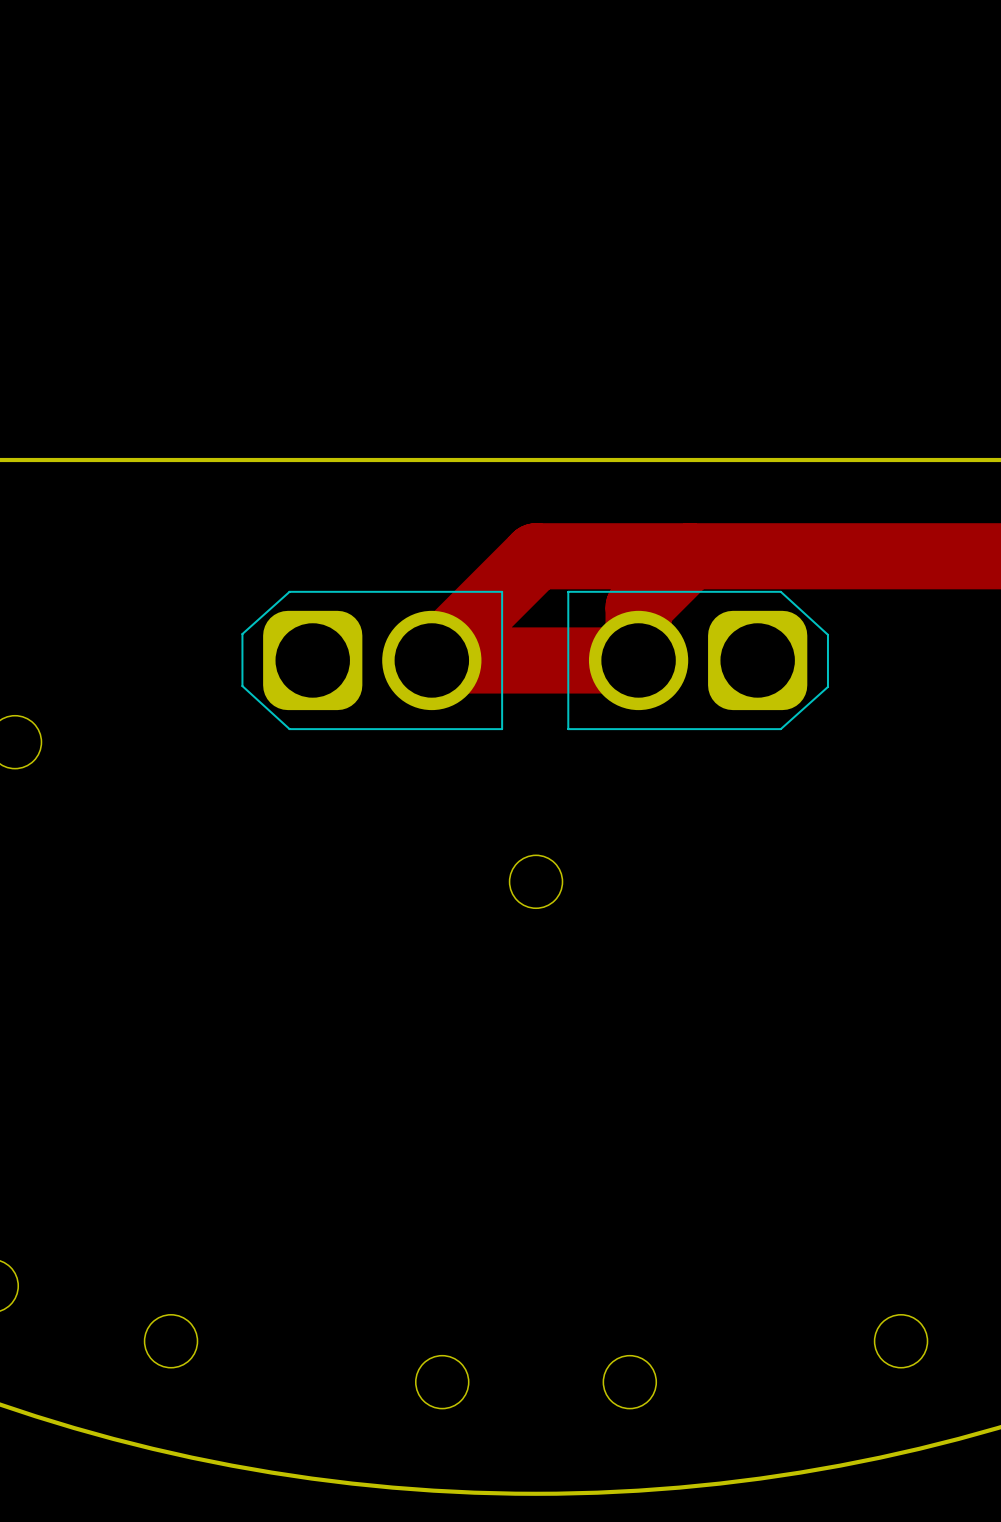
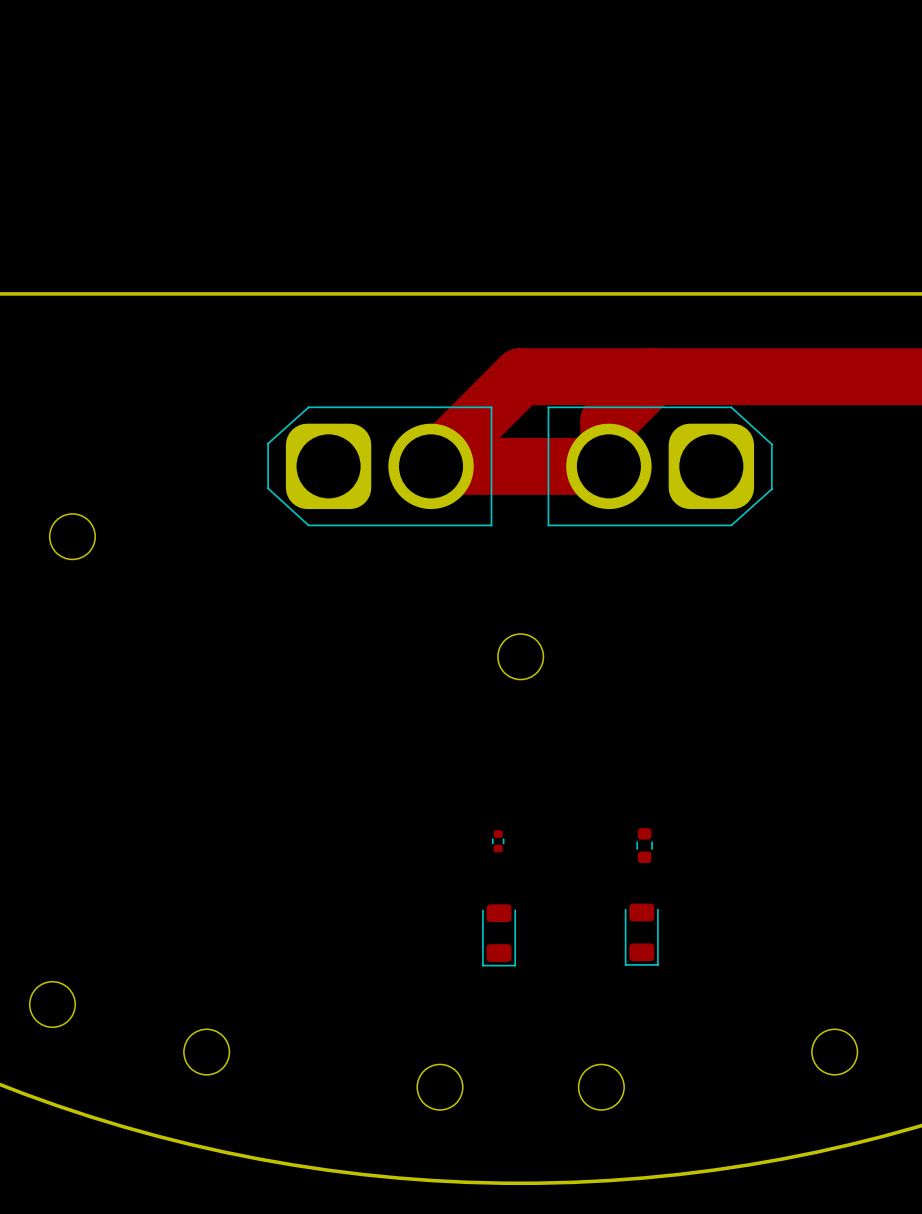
part: none -> (498, 841)
part: none -> (644, 845)
part: none -> (641, 934)
part: none -> (499, 935)

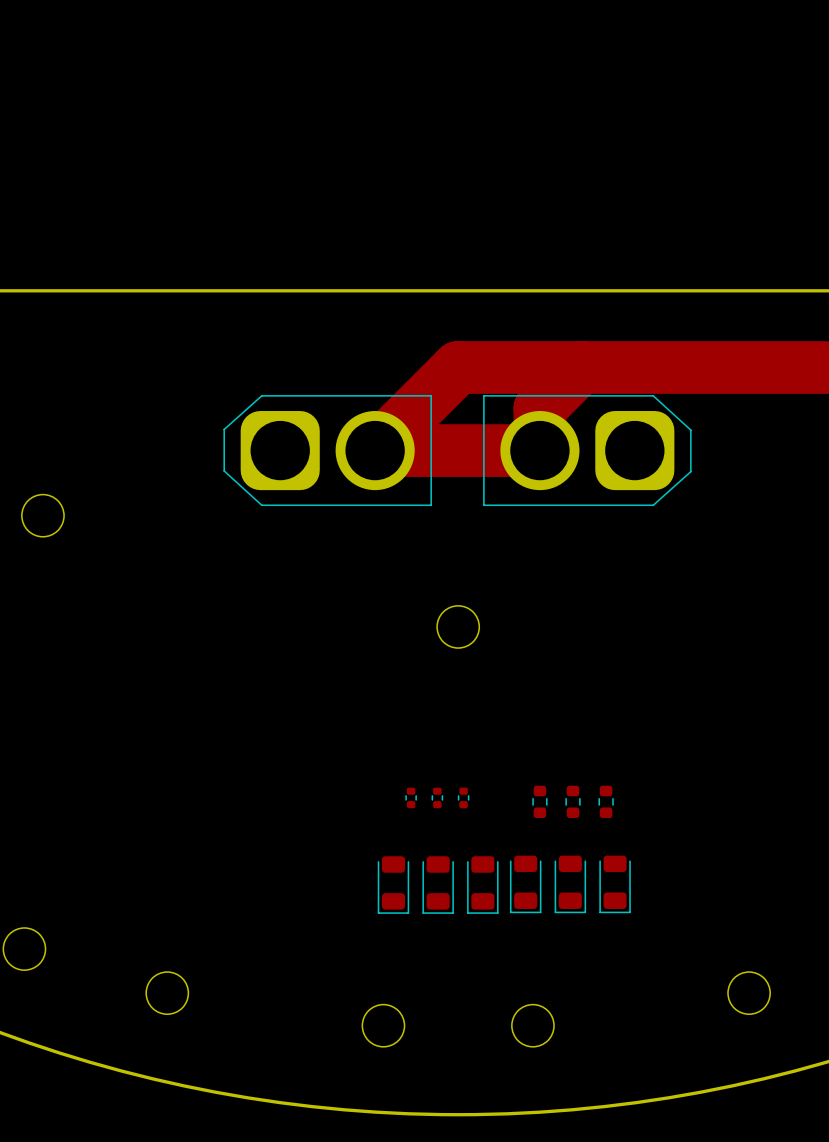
part: none -> (411, 797)
part: none -> (463, 797)
part: none -> (539, 801)
part: none -> (606, 801)
part: none -> (525, 884)
part: none -> (615, 884)
part: none -> (393, 885)
part: none -> (482, 885)

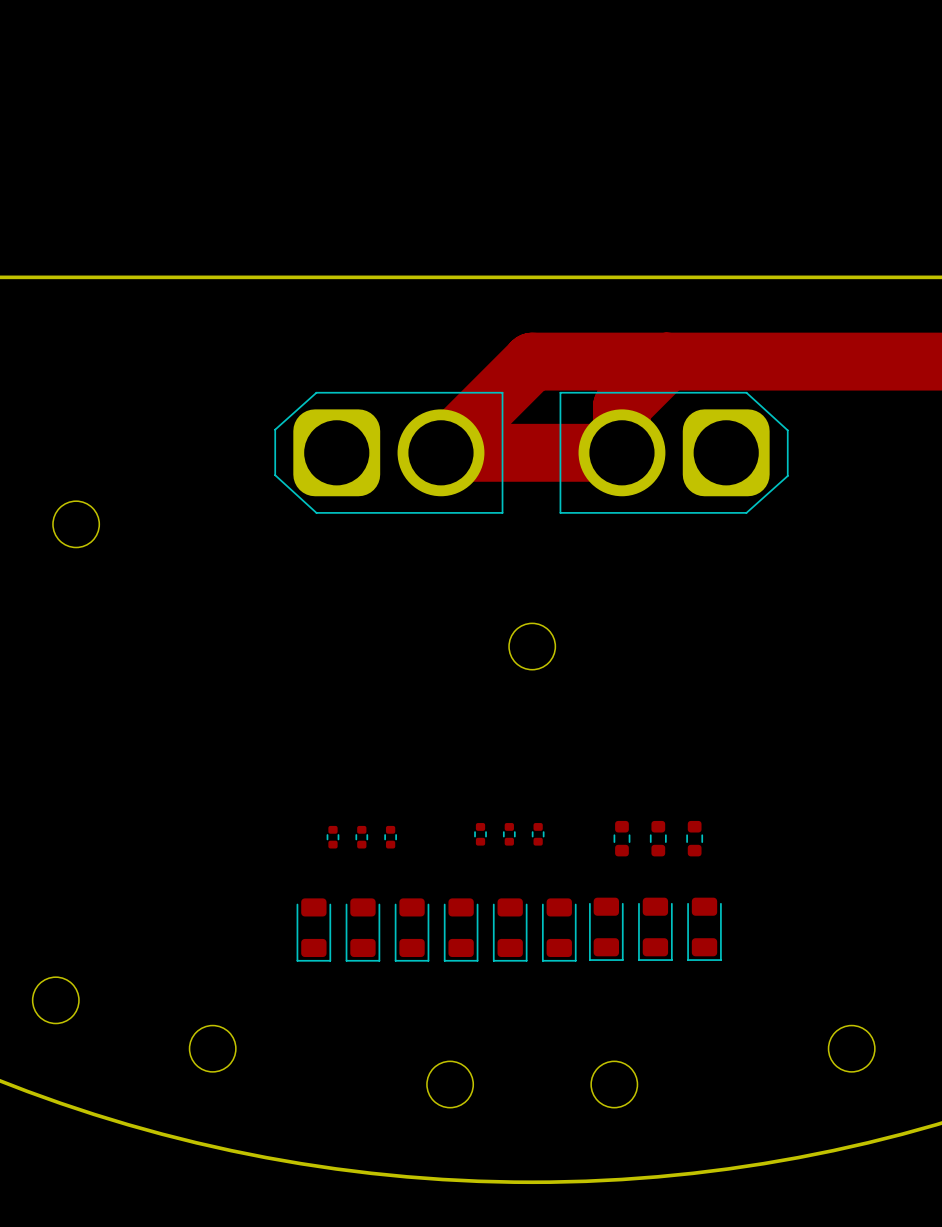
part: none -> (332, 837)
part: none -> (361, 837)
part: none -> (390, 837)
part: none -> (313, 930)
part: none -> (362, 930)
part: none -> (412, 930)

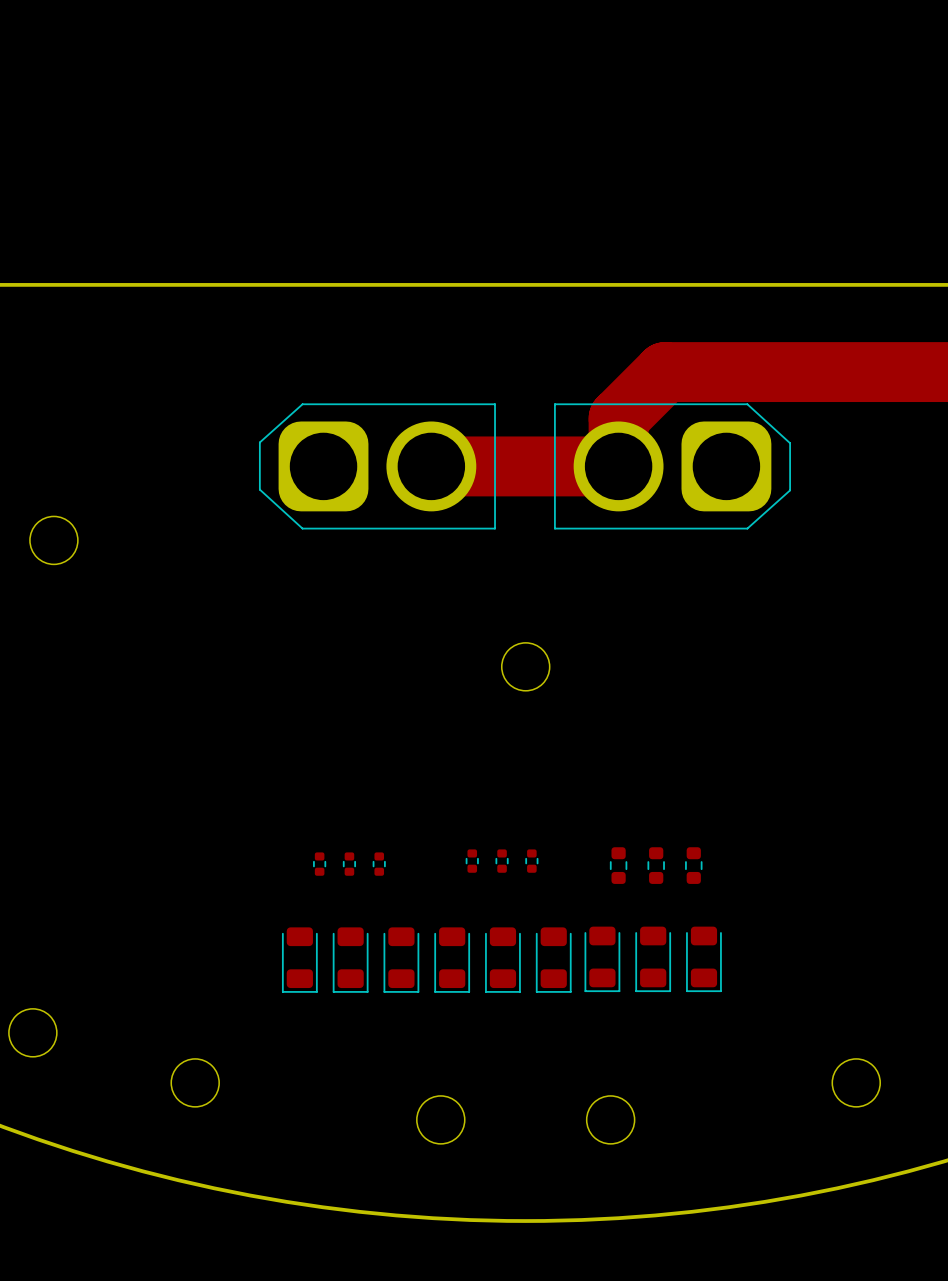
track: (666, 361) (532, 361) (440, 452) -> none

